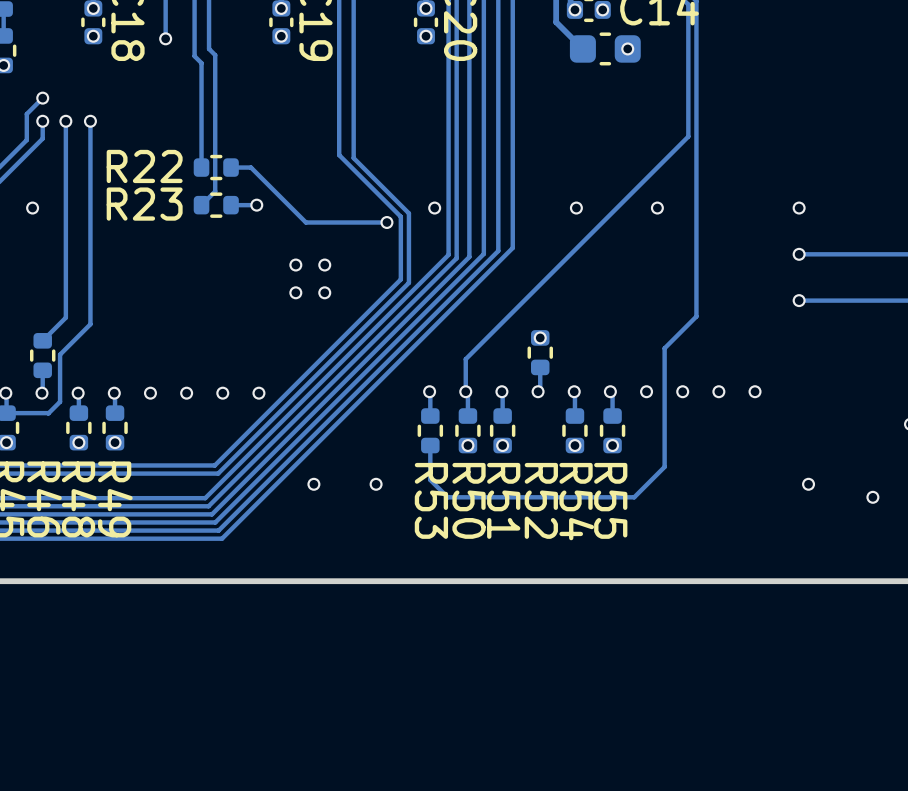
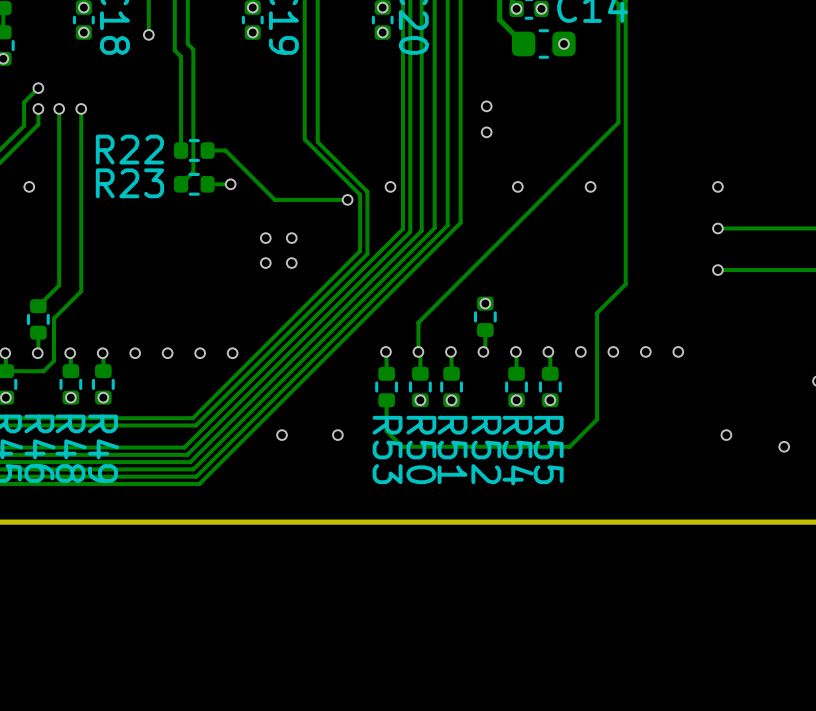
via: none -> (486, 106)
via: none -> (486, 132)

